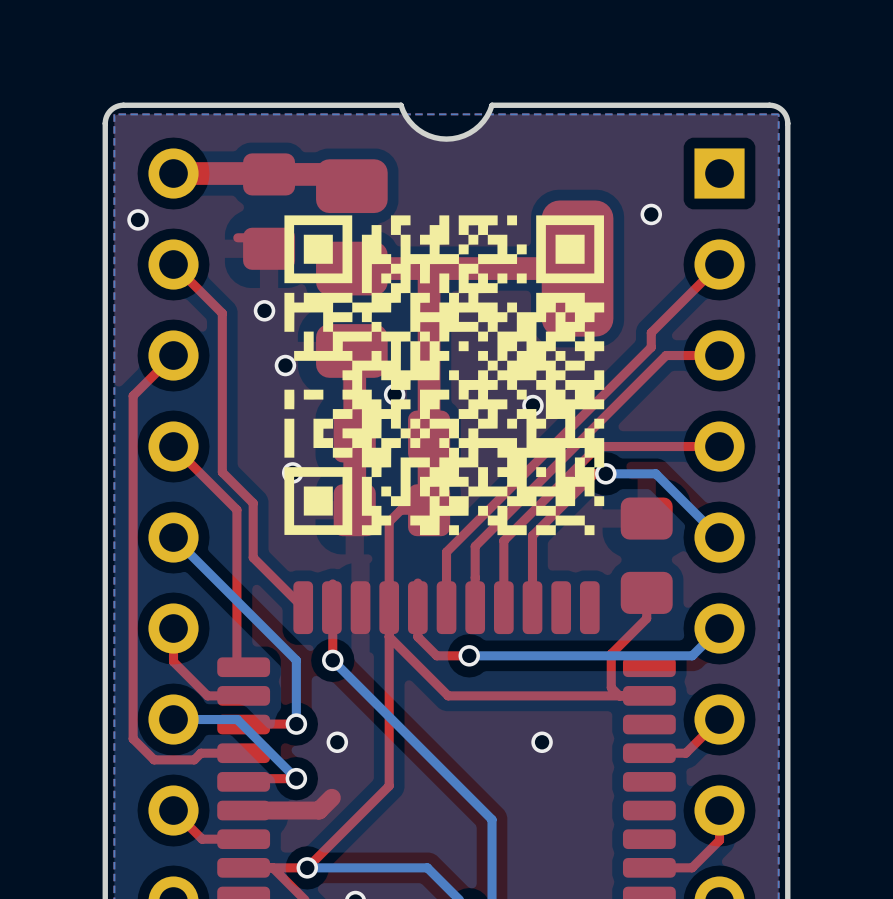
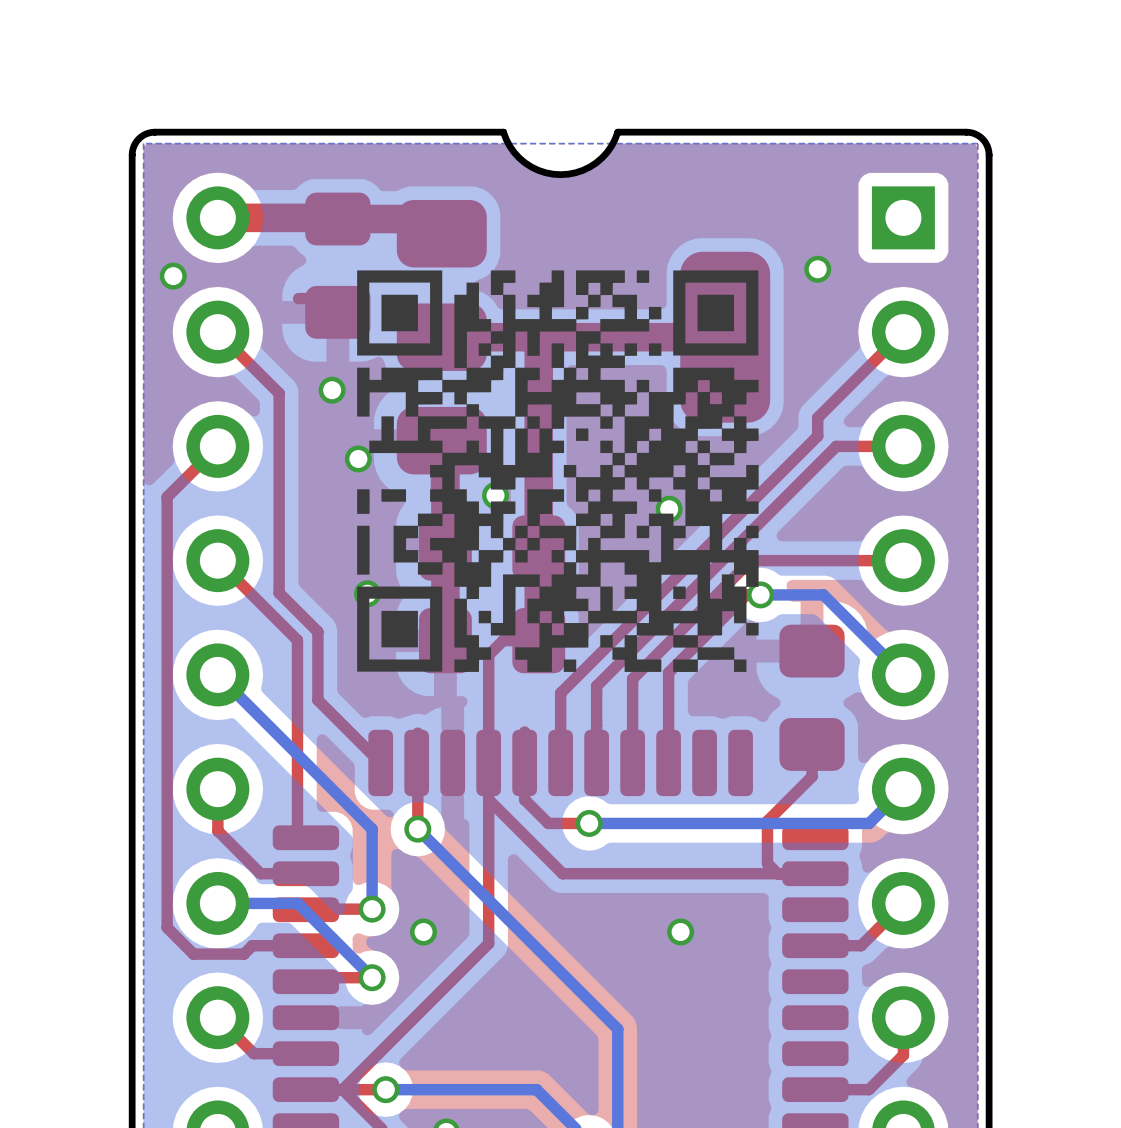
top track: (389, 751) (389, 785) (307, 867) -> (488, 943) (342, 1089)
top track: (331, 797) (319, 810) (243, 810) -> none

